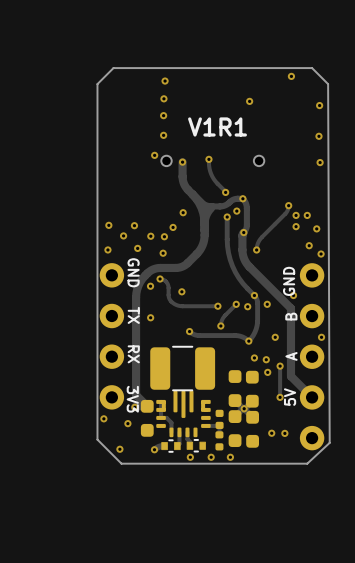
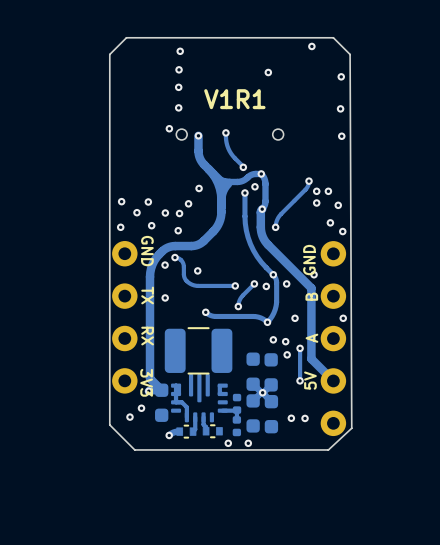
via: (103, 418) -> none
via: none -> (129, 417)
via: (119, 449) -> none
via: (190, 457) -> none

